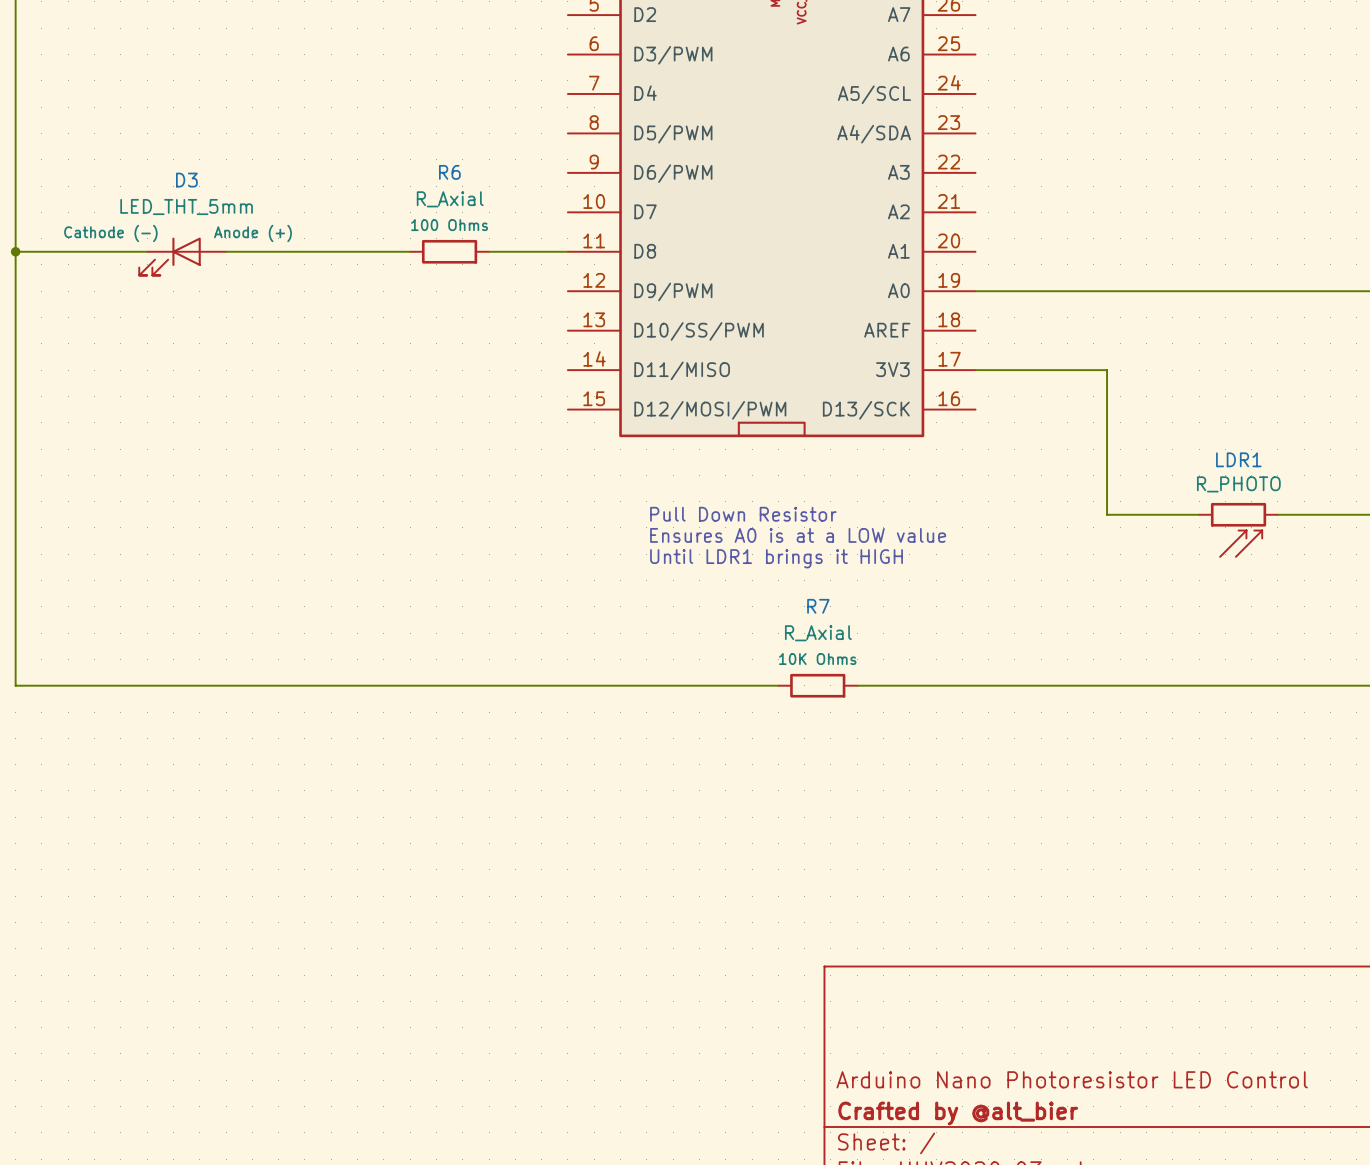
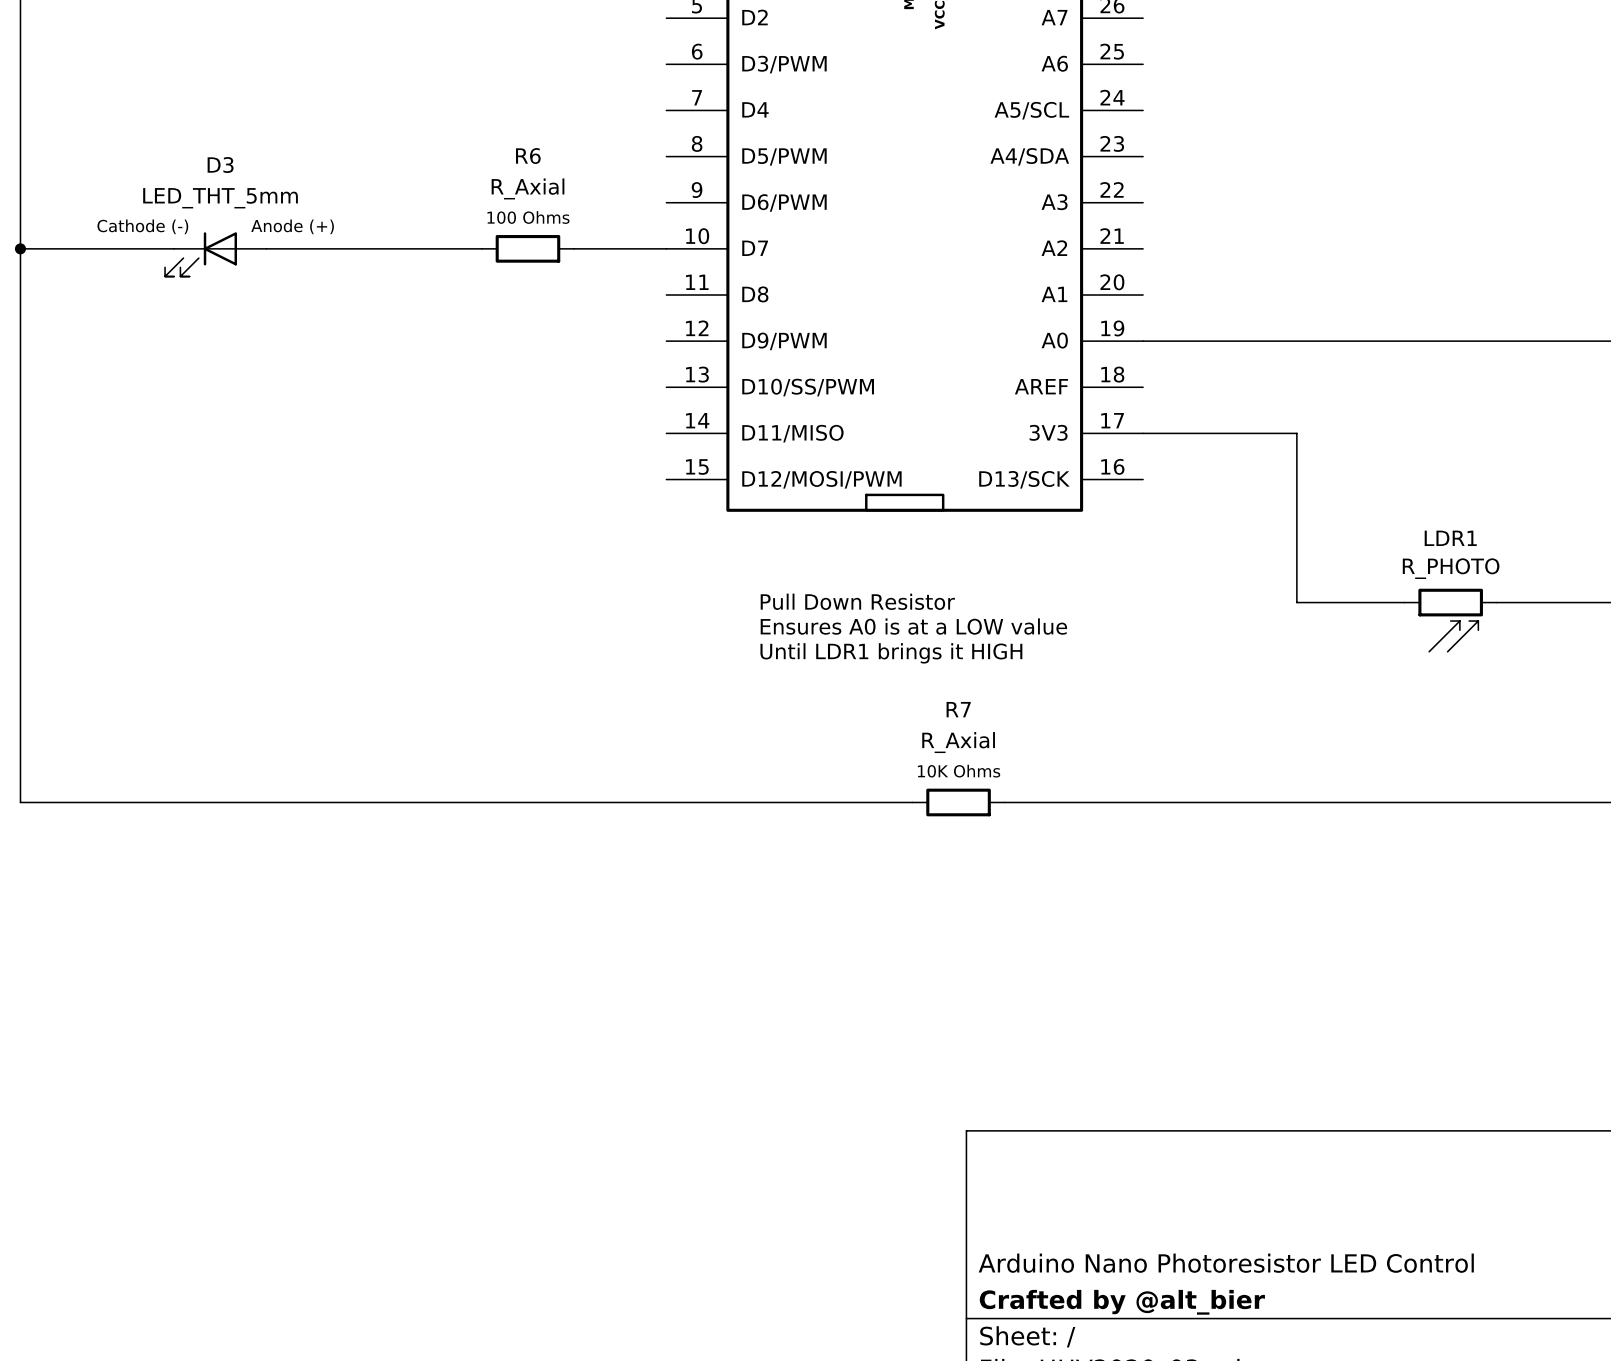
wire: (15, 251) (147, 251) -> (20, 248) (174, 248)
junction position: (15, 251) -> (20, 248)
wire: (226, 251) (410, 251) -> (266, 248) (481, 248)
R6 position: (449, 251) -> (527, 248)
wire: (489, 251) (567, 251) -> (574, 248) (666, 248)
D3 position: (182, 256) -> (215, 254)

